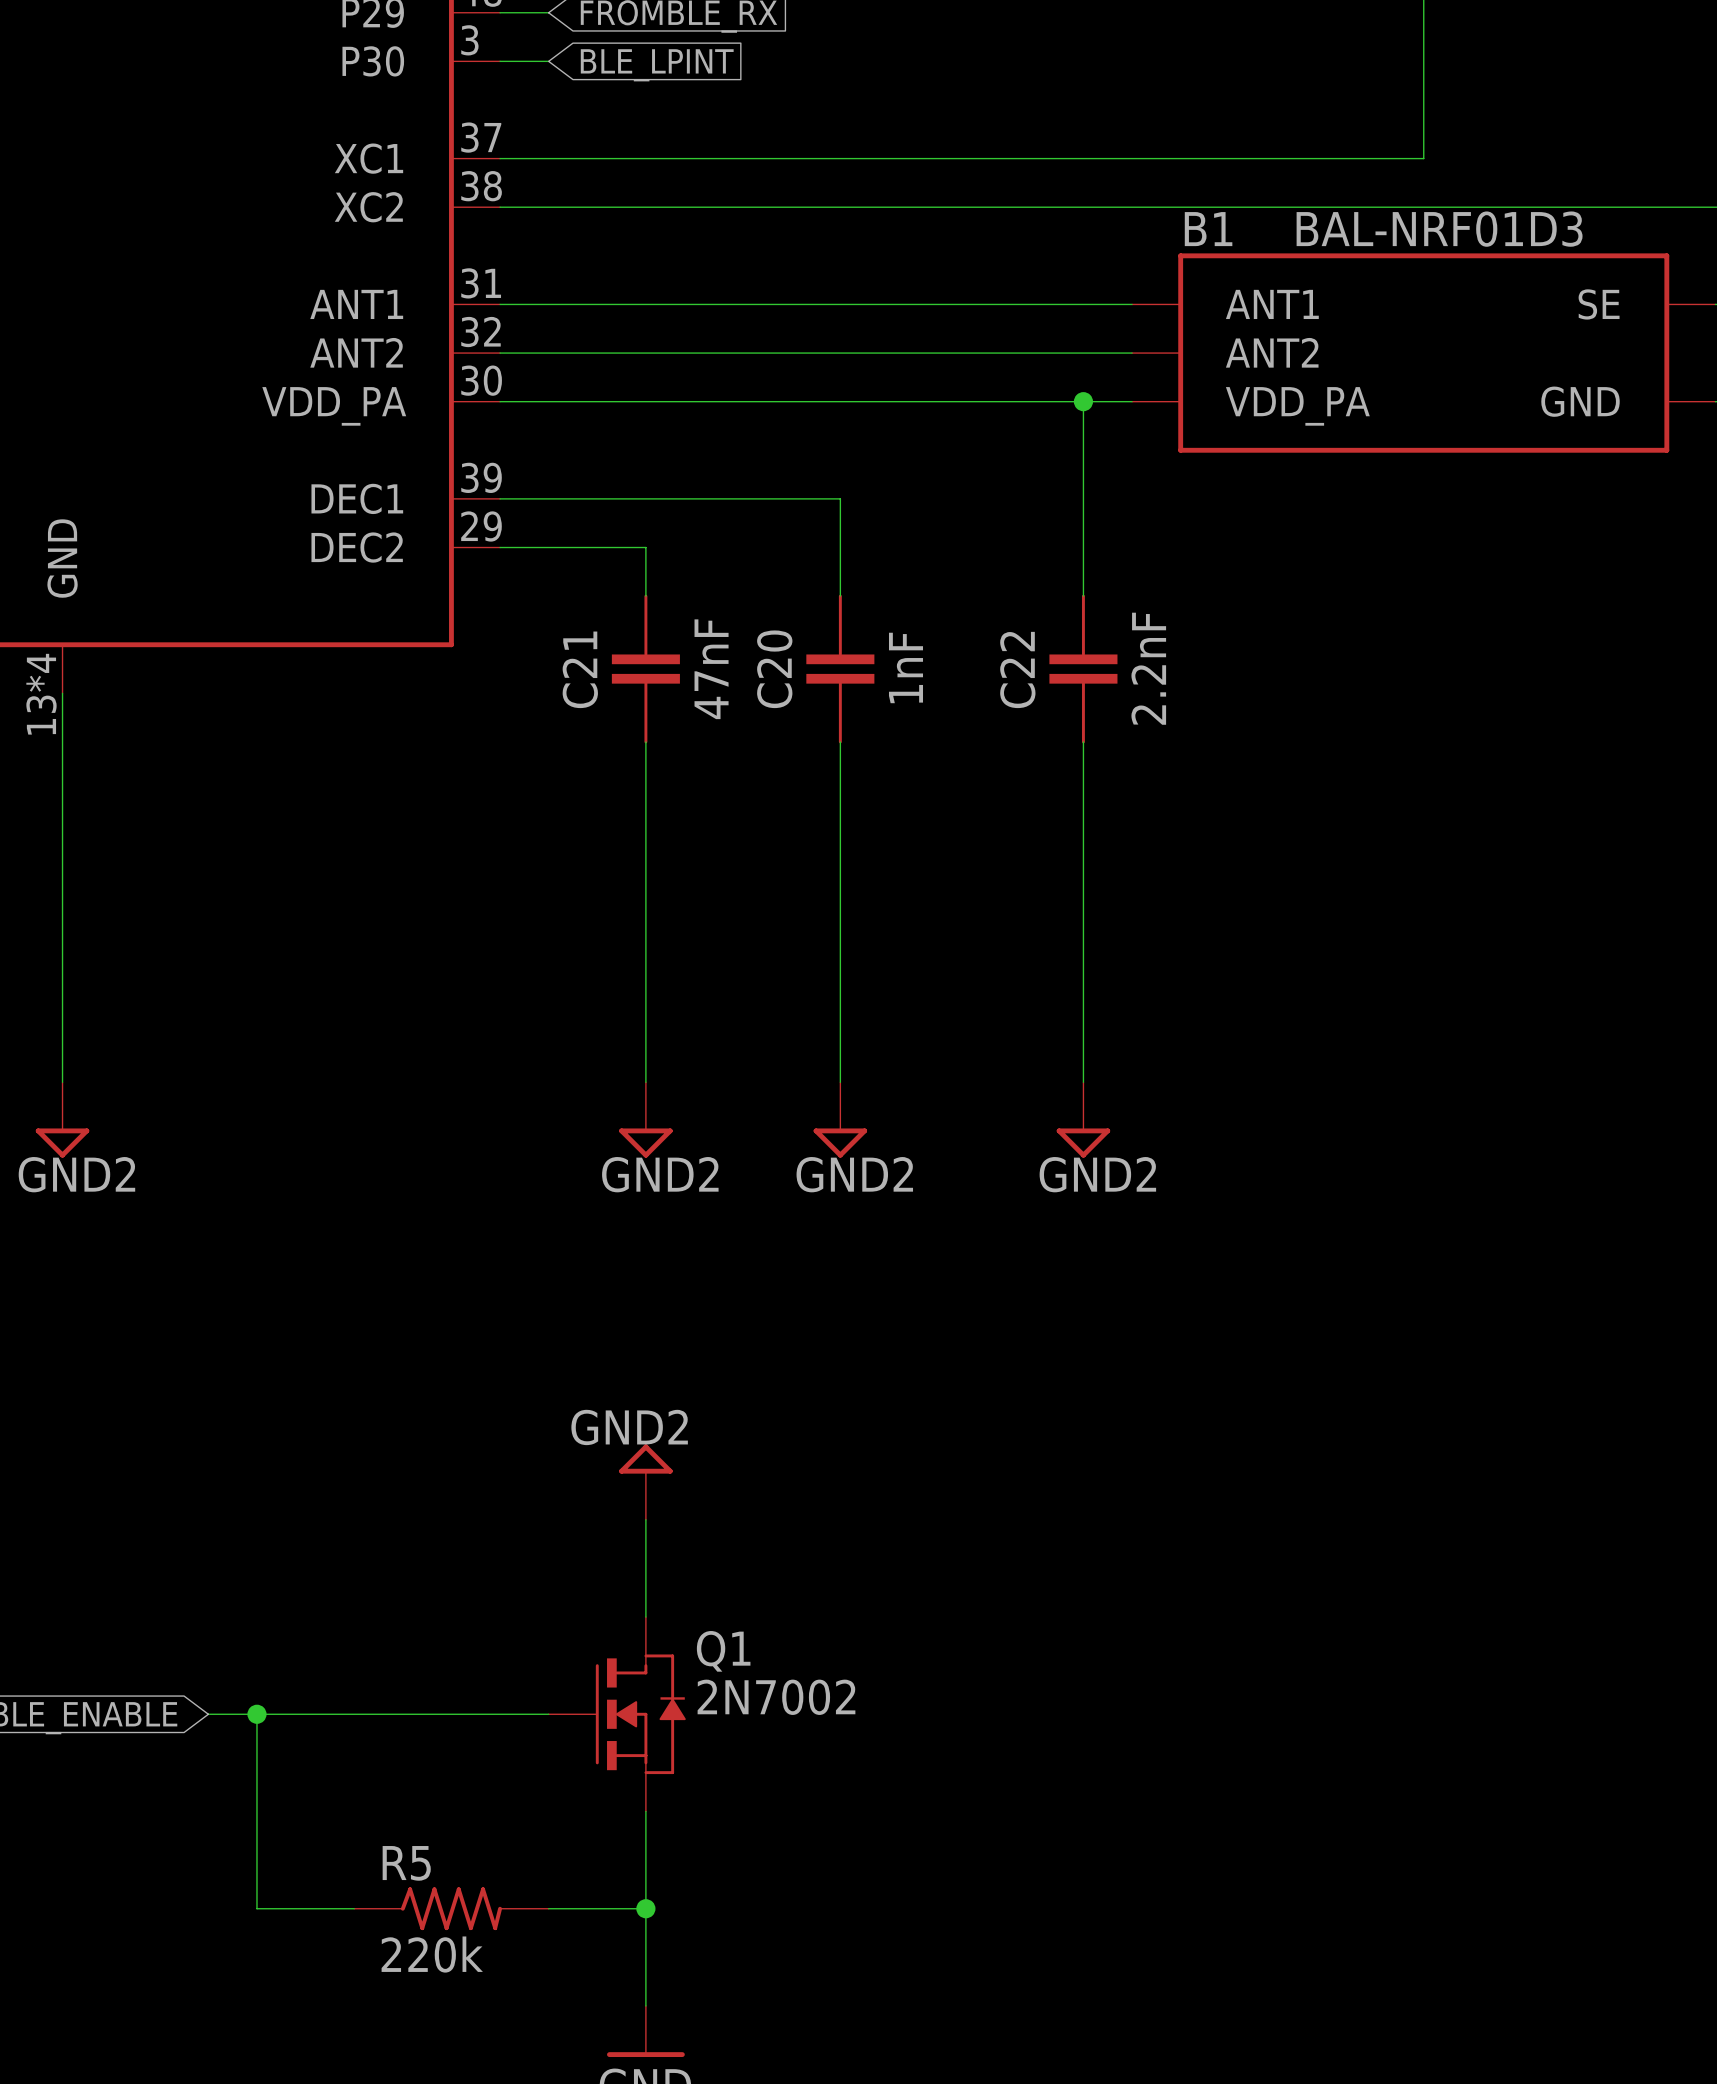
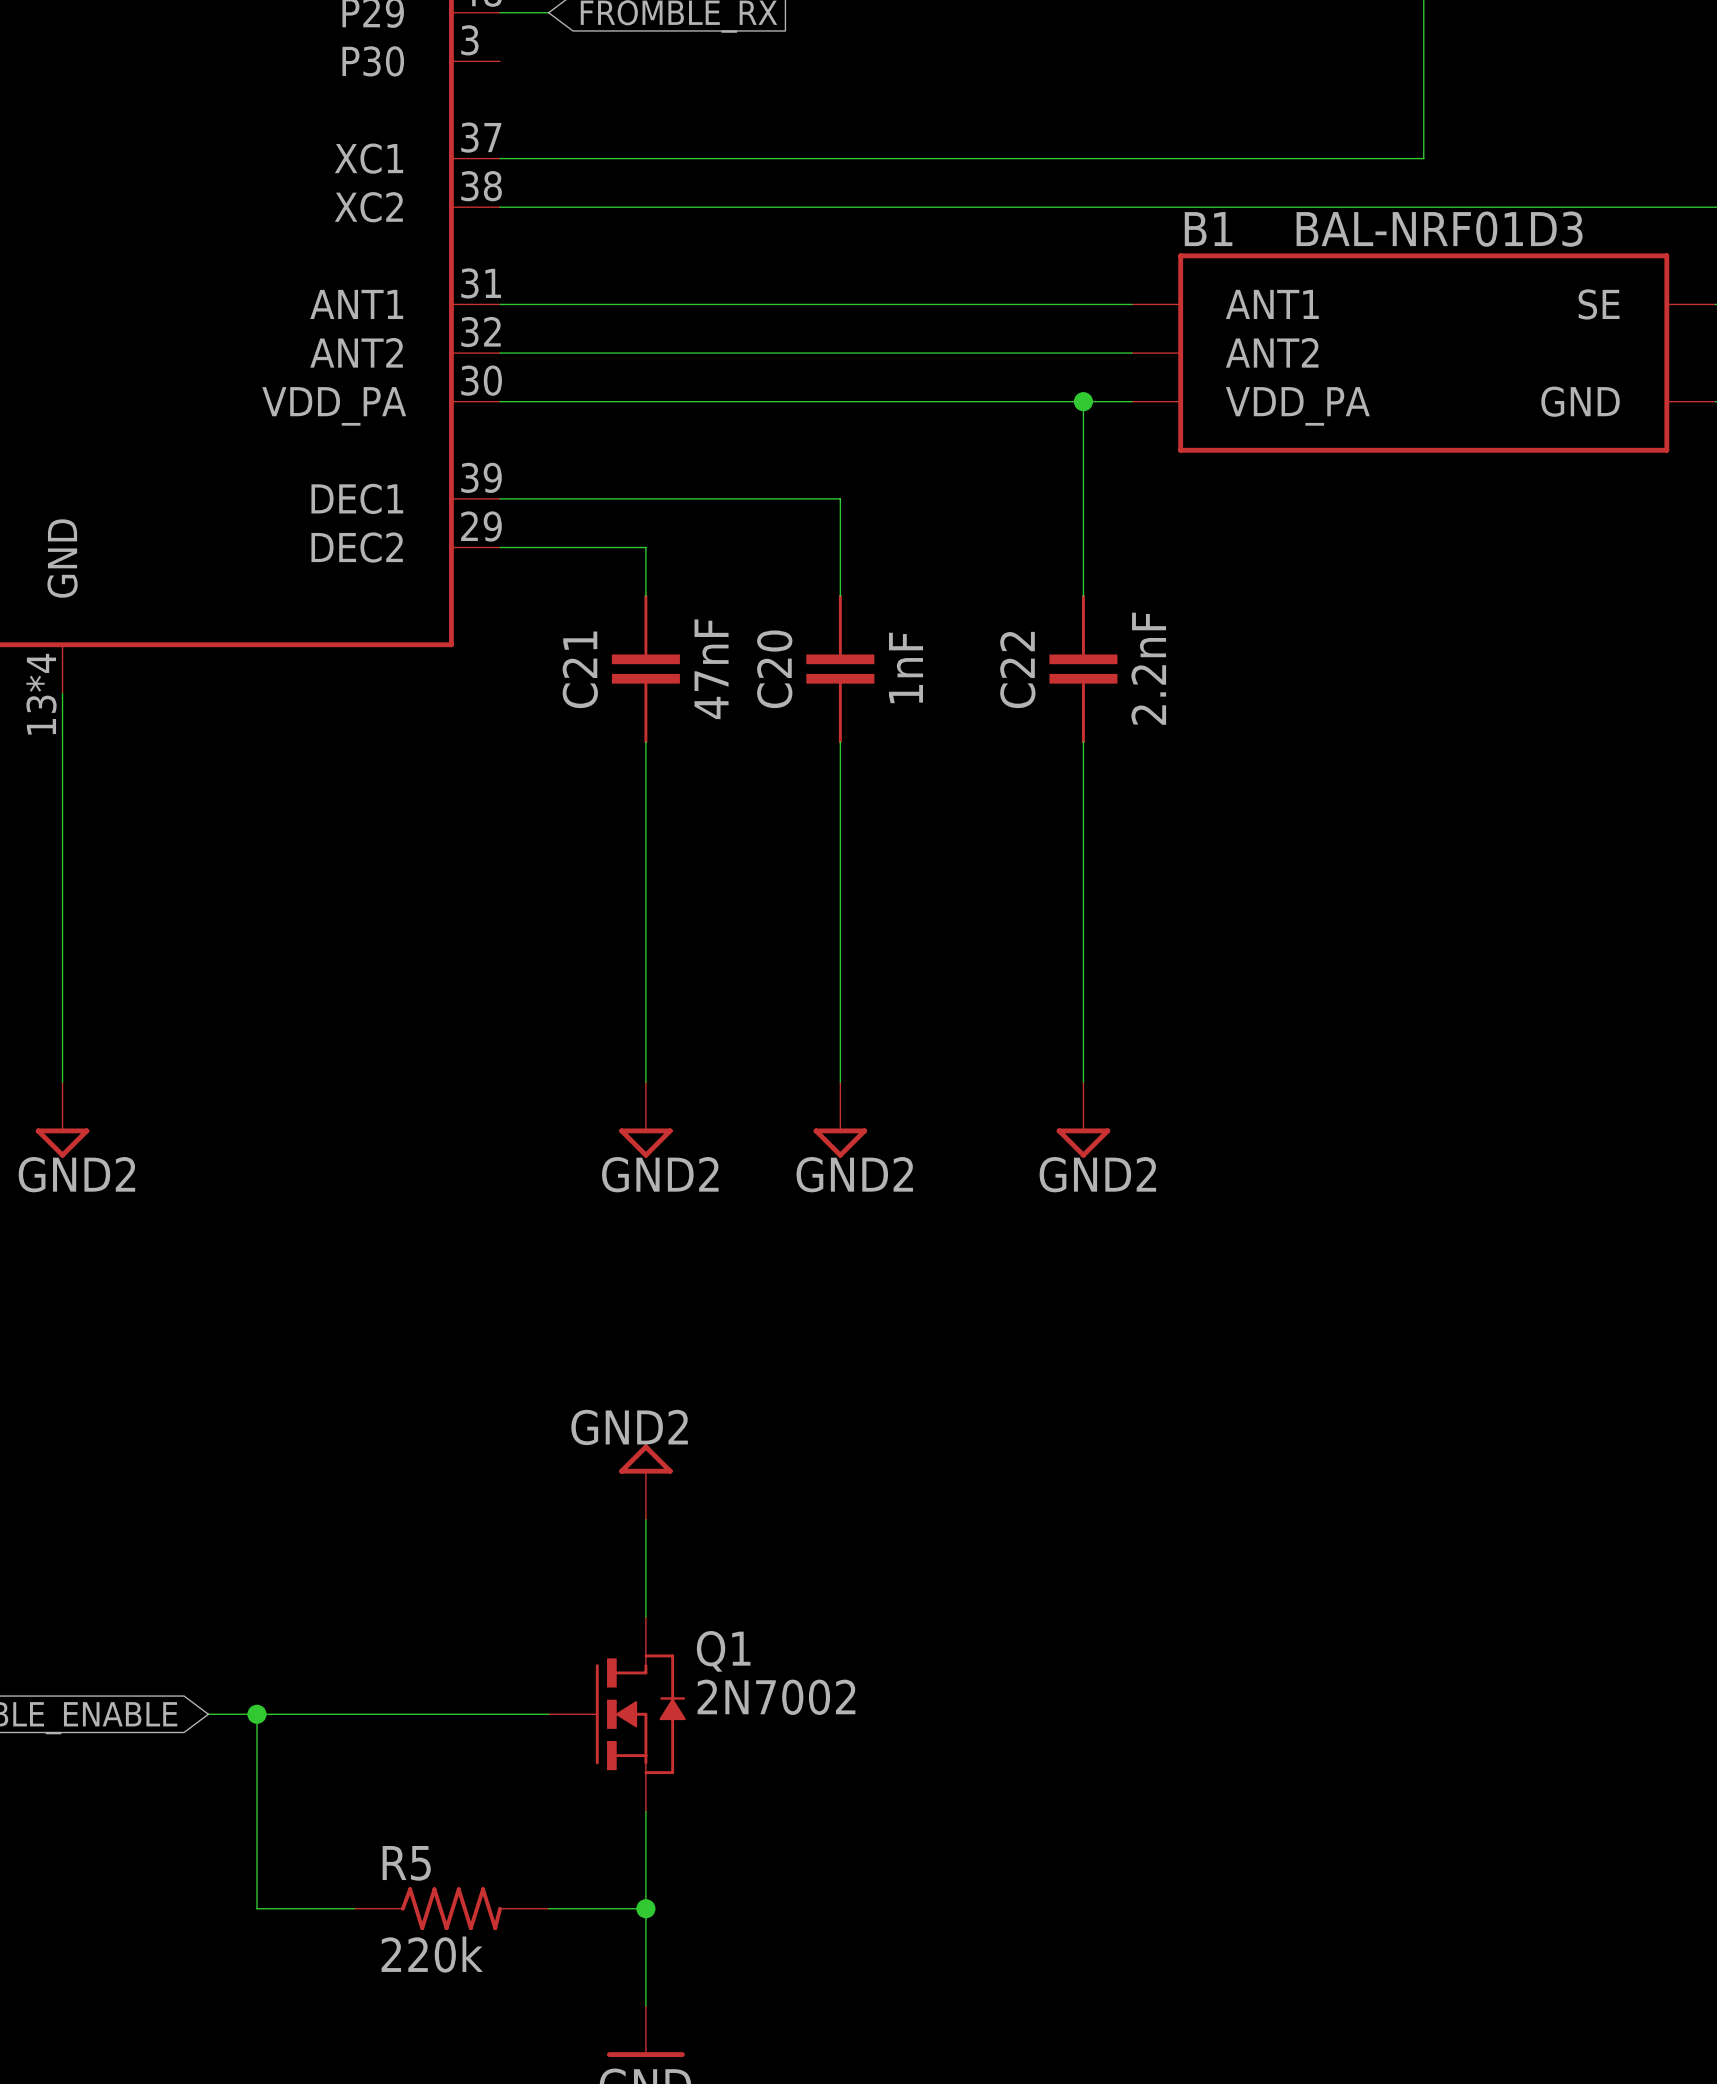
wire: (500, 61) (548, 61) -> none
global label: BLE_LPINT (657, 65) -> none

